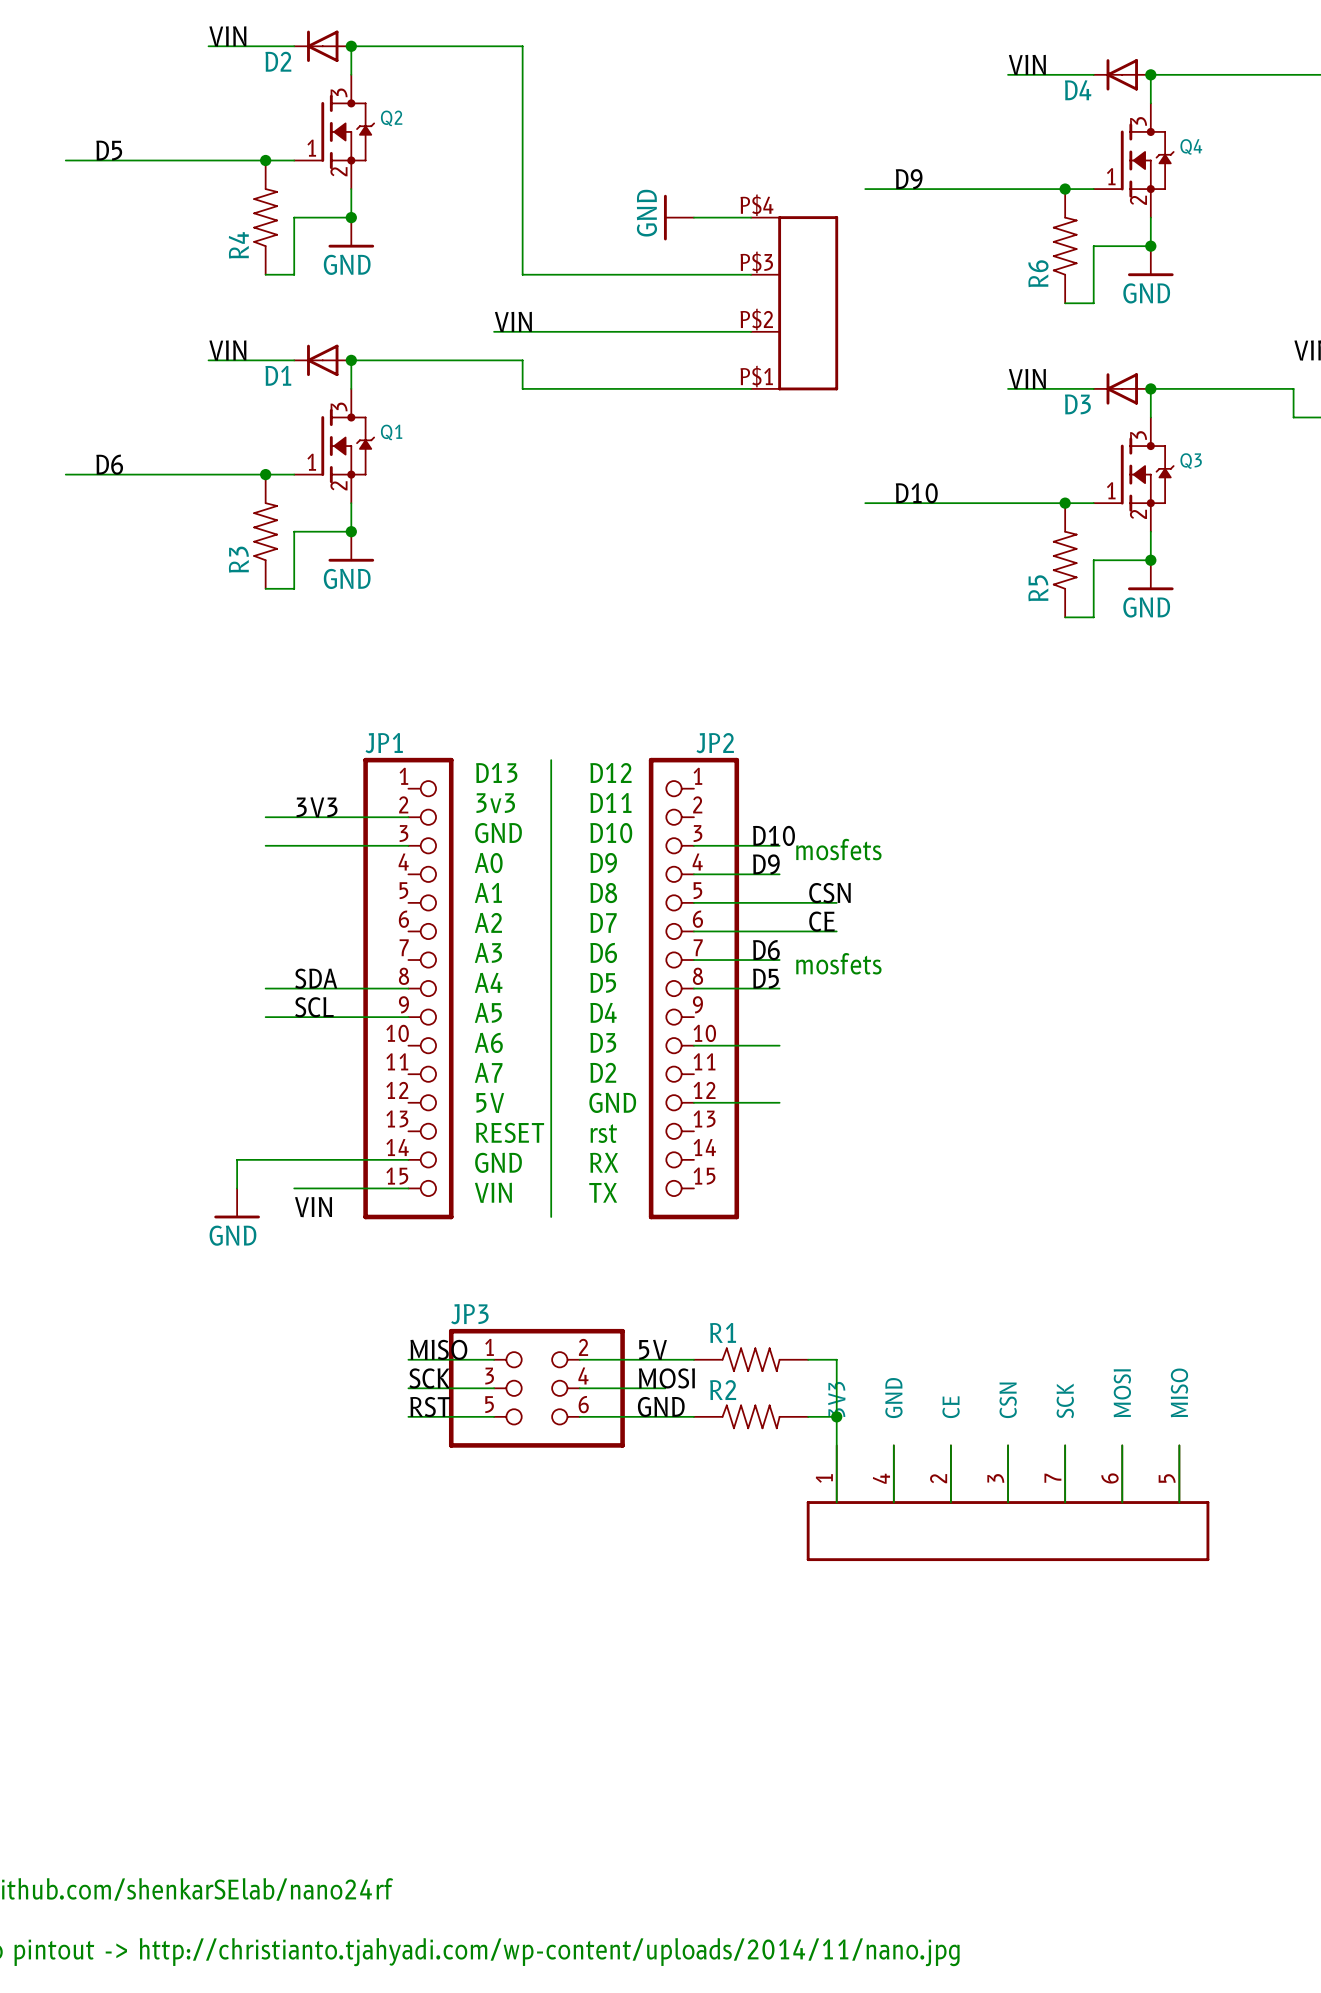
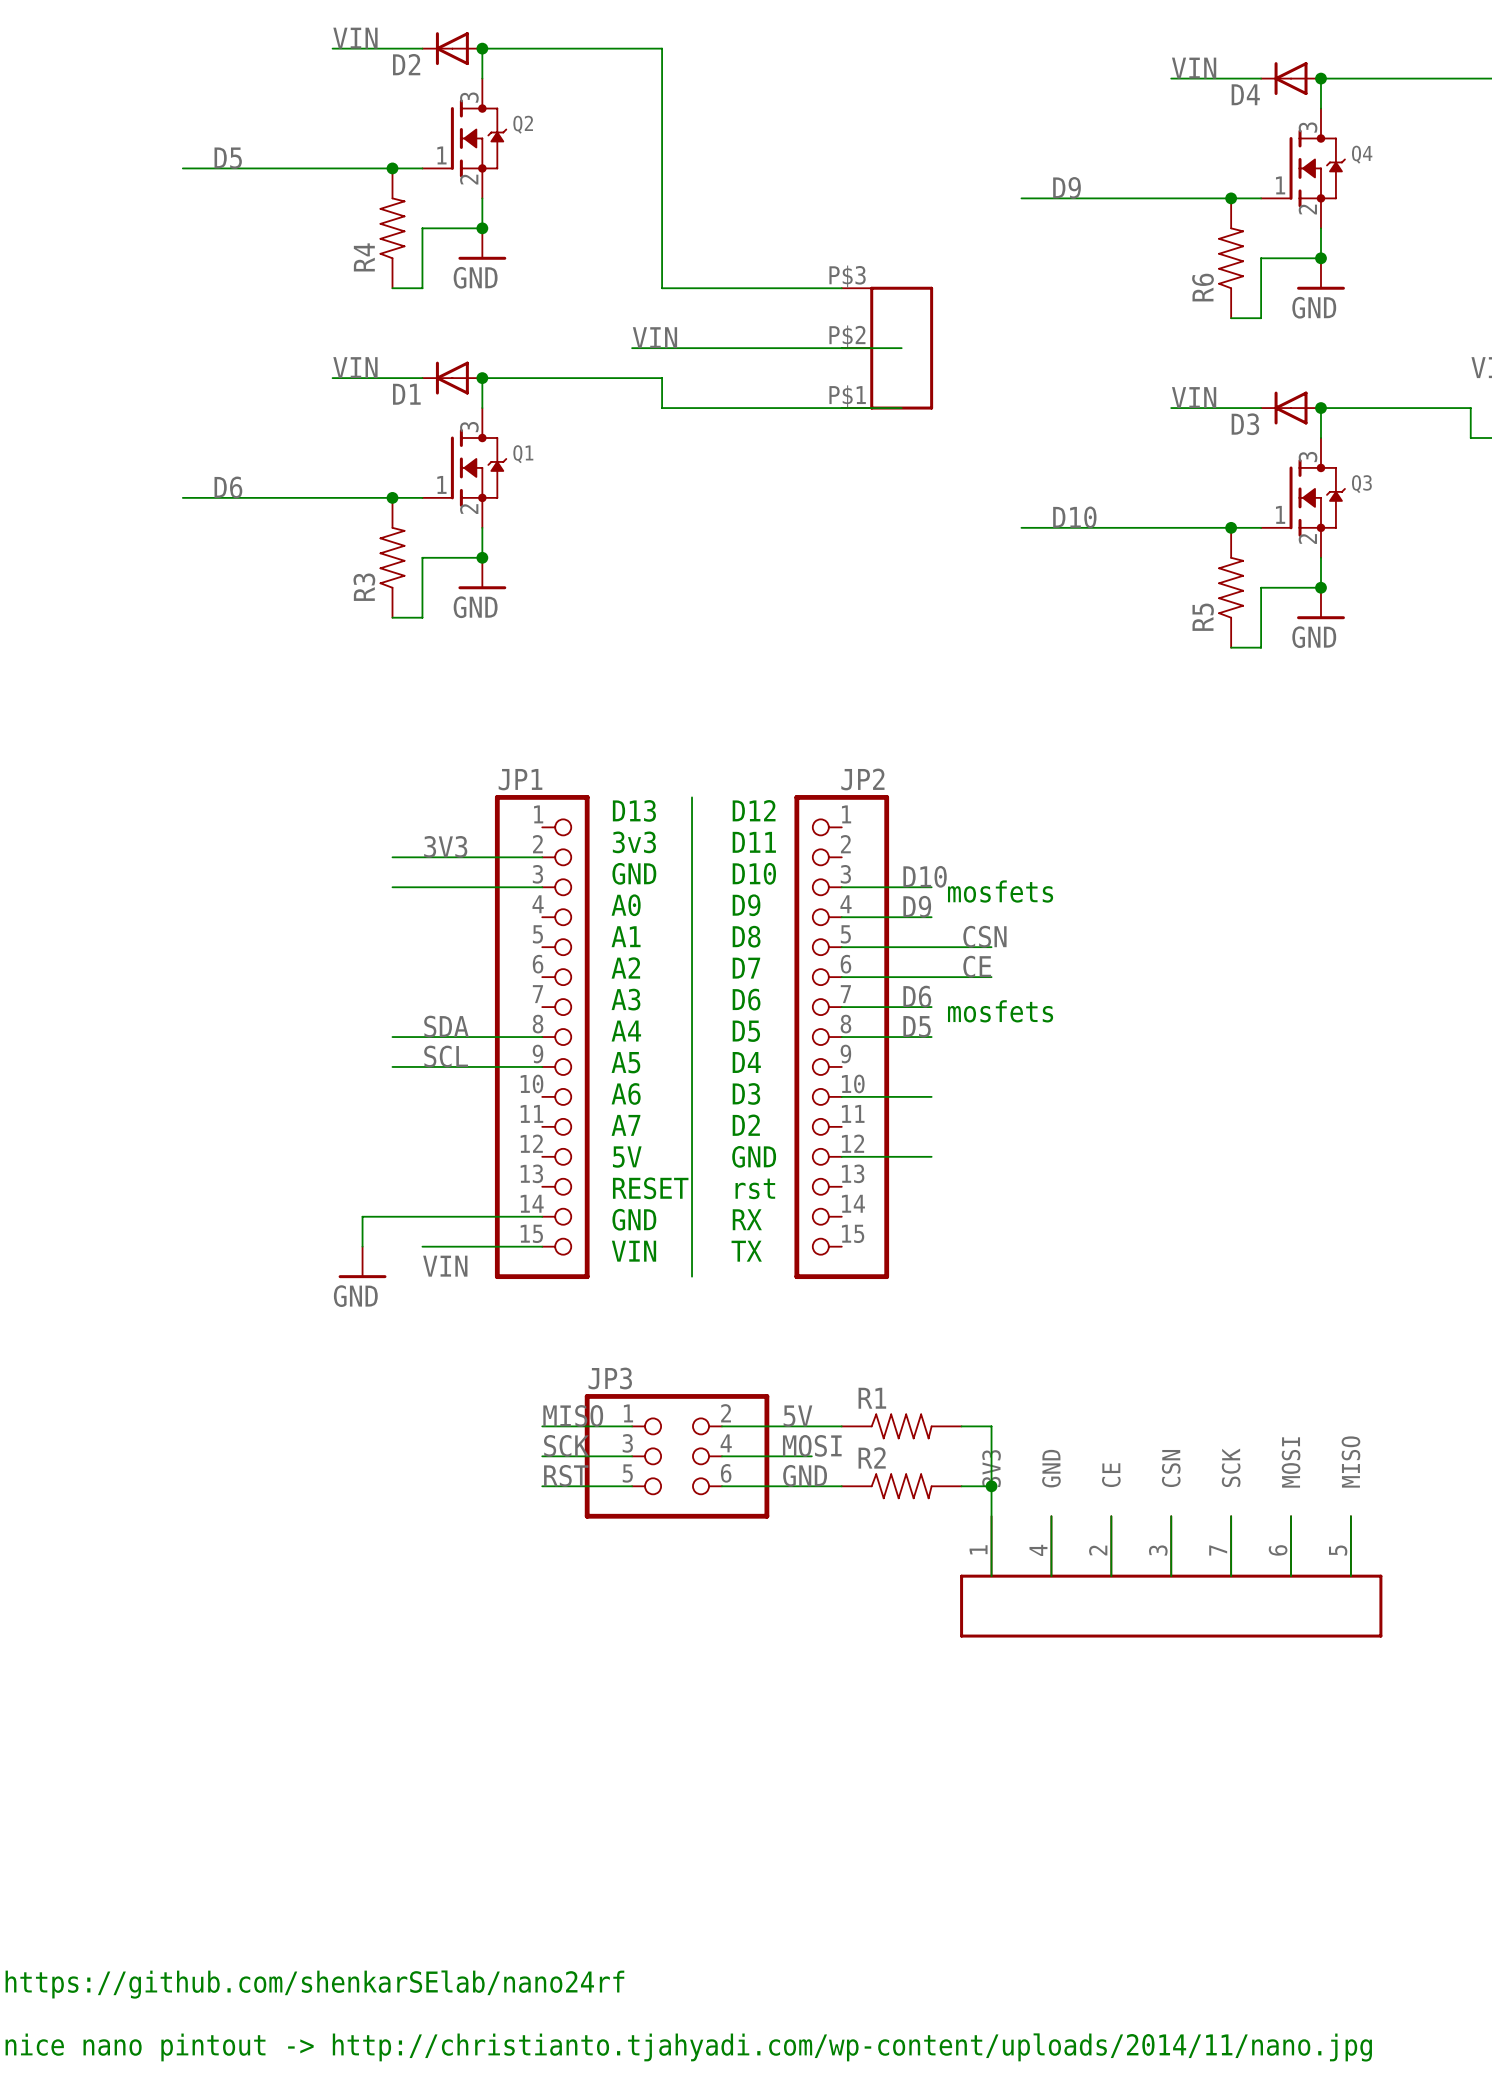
power symbol: GND (678, 217) -> none
wire: (693, 217) (751, 217) -> none
part: (794, 303) -> none
part: none -> (887, 348)

